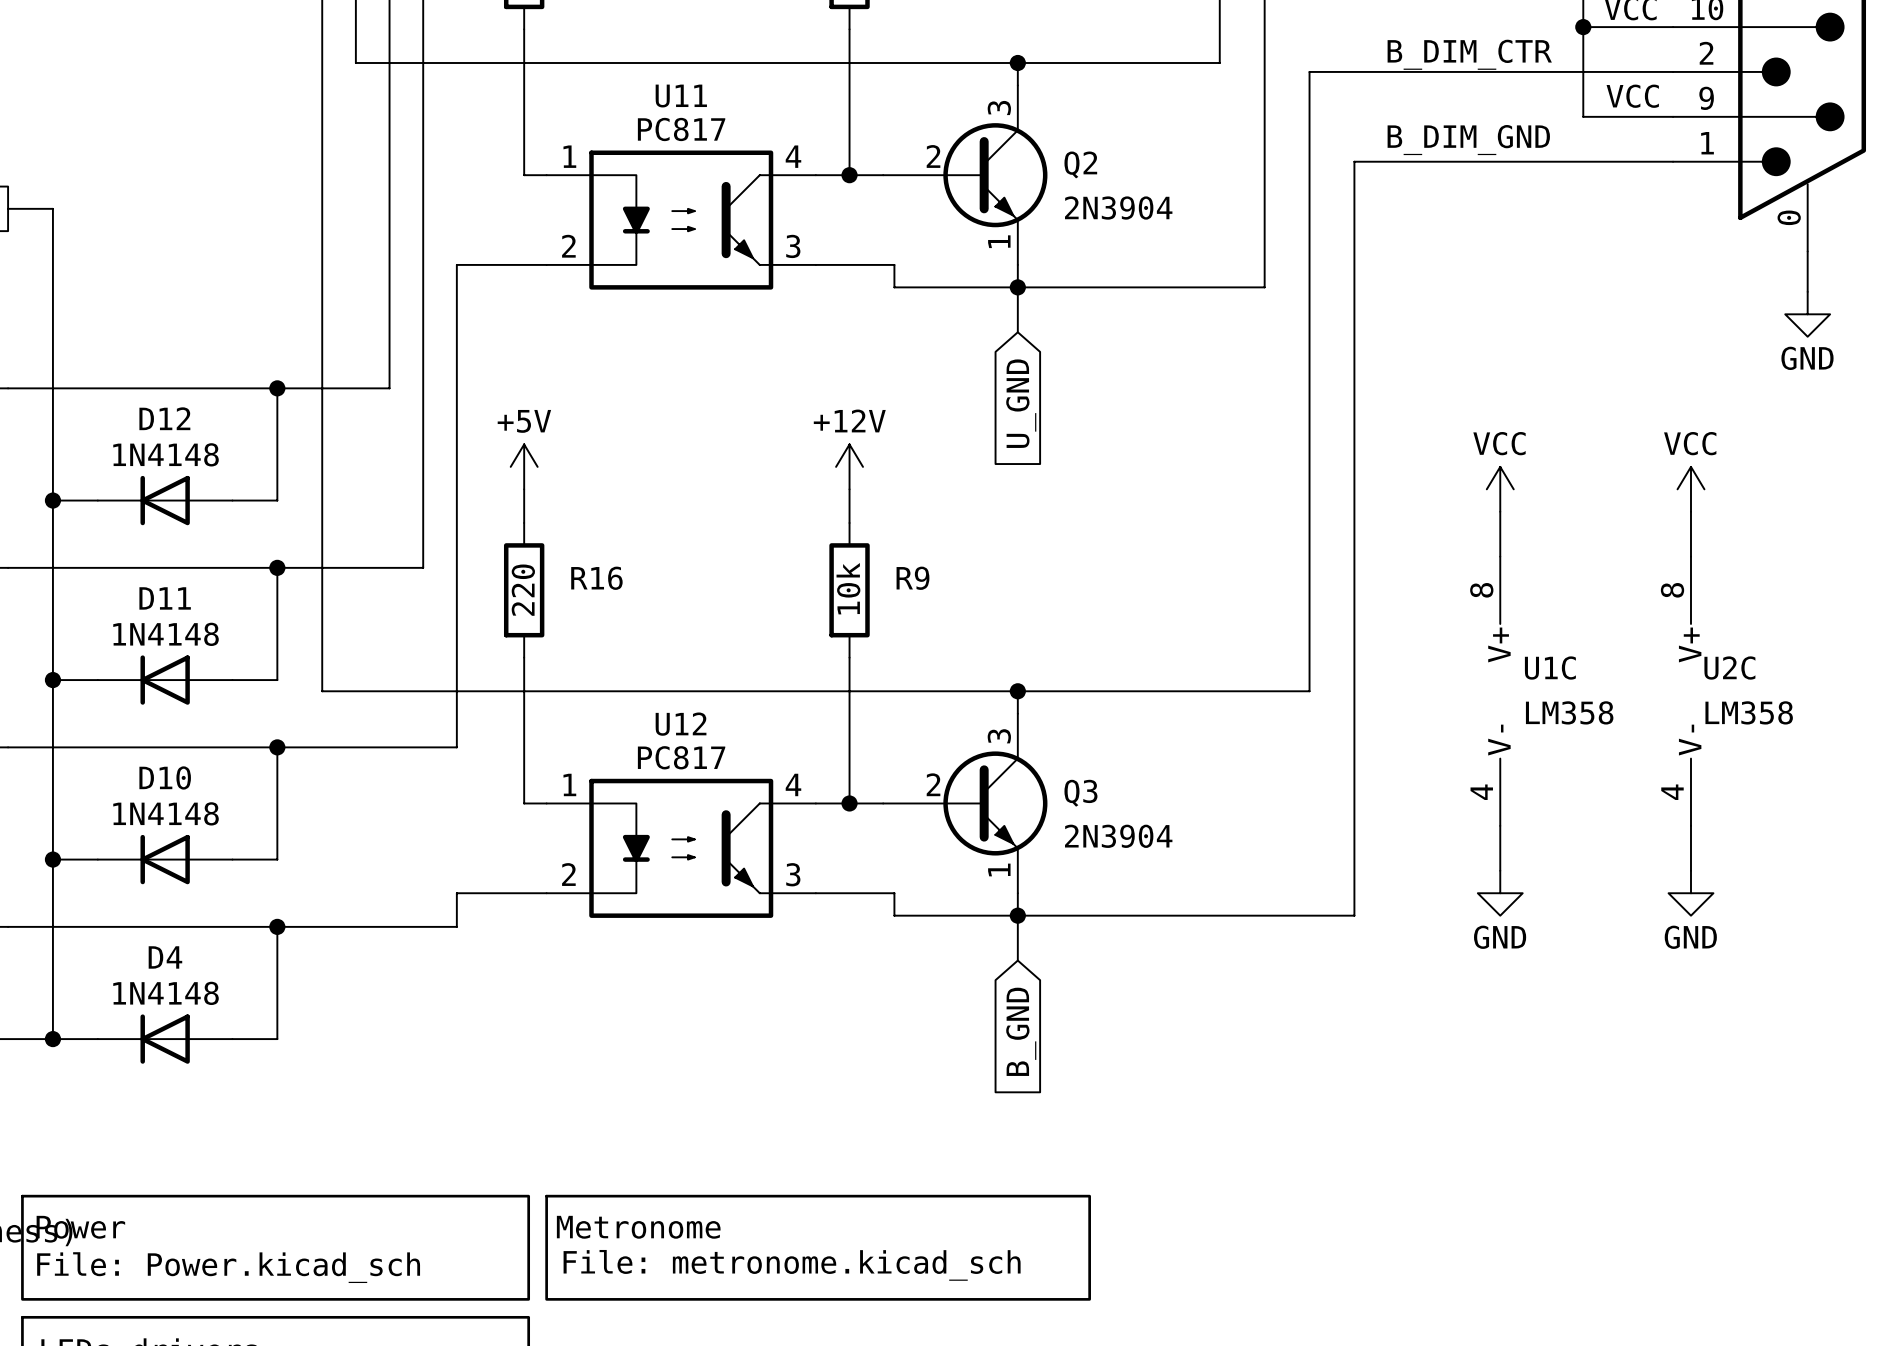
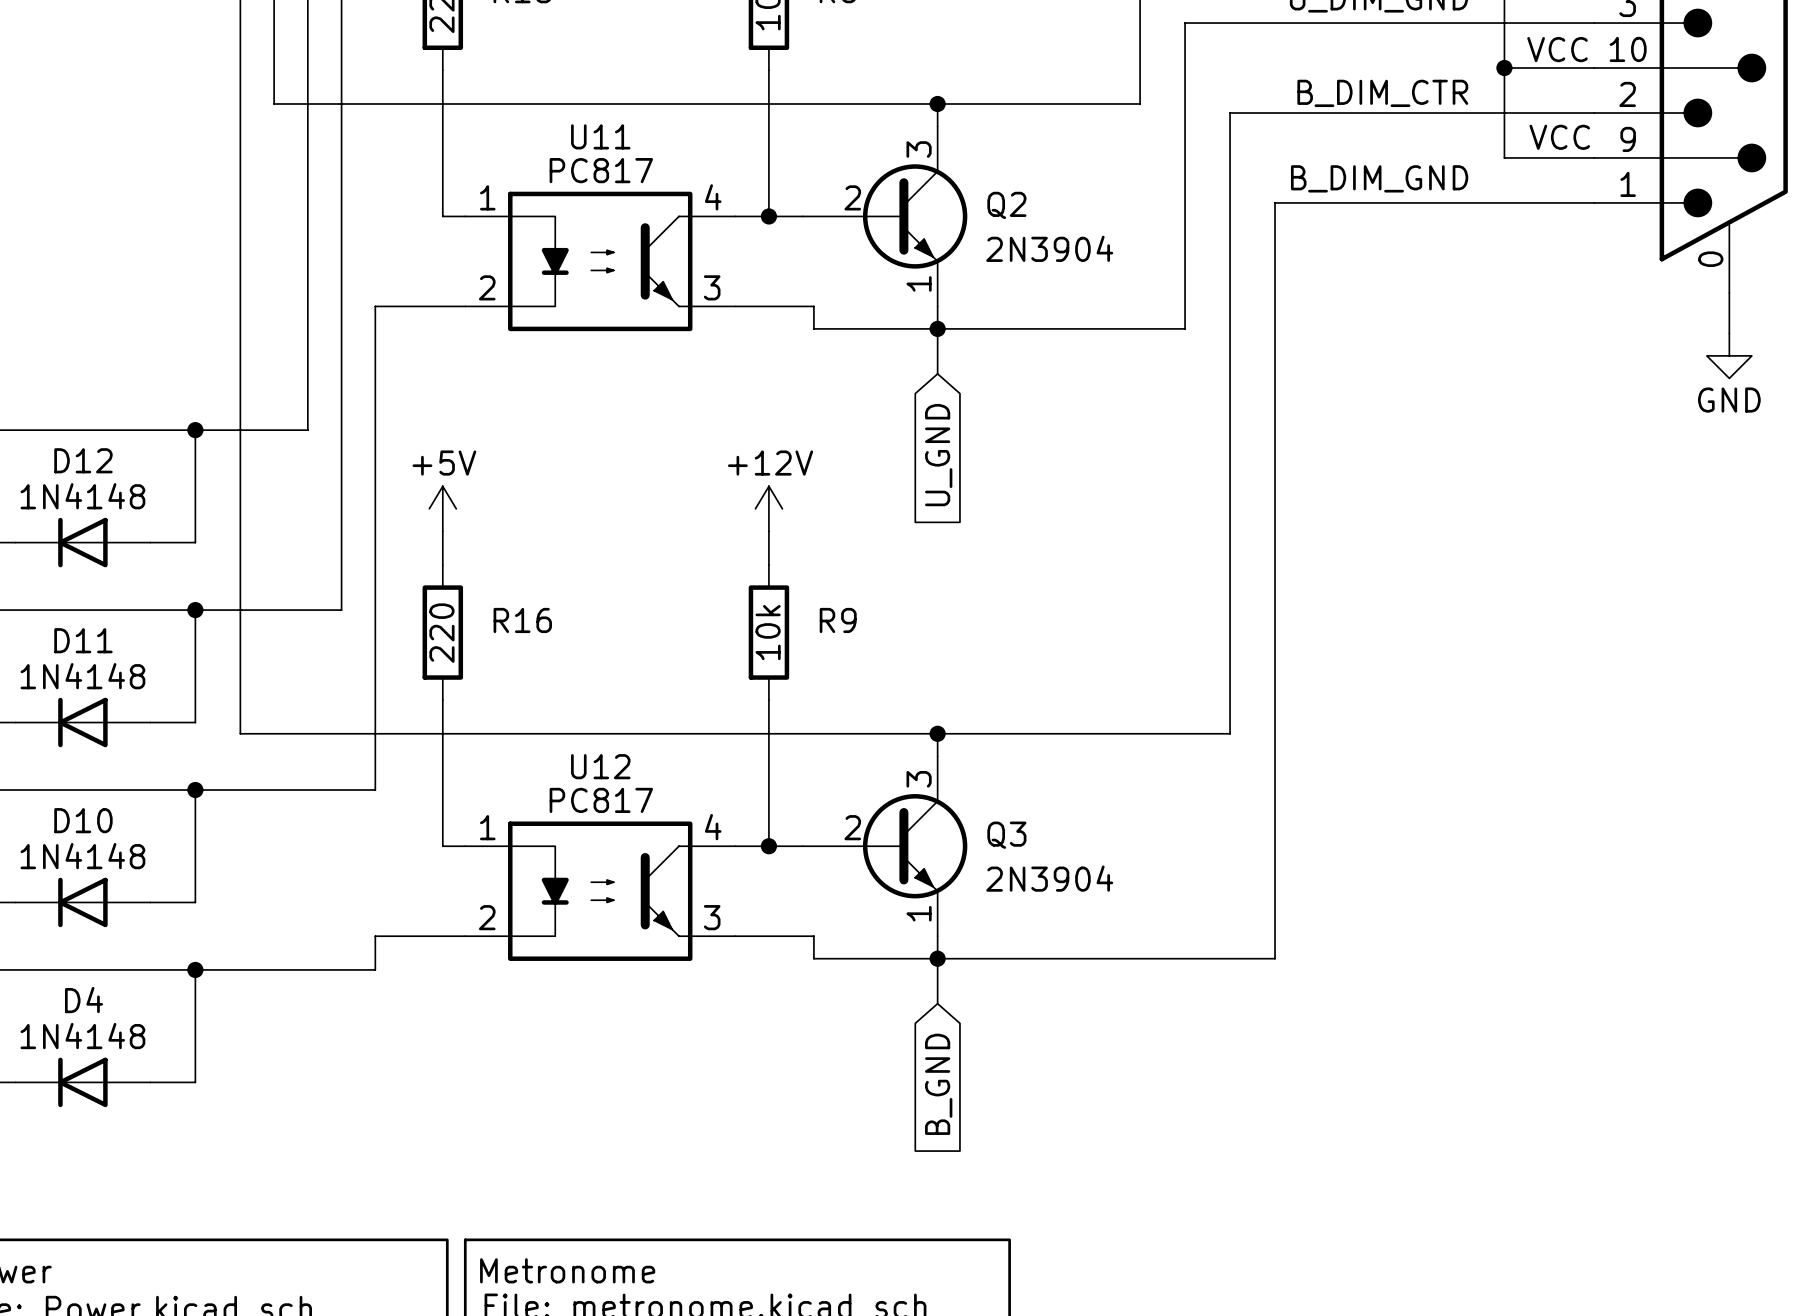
power symbol: VCC (1500, 489) -> none
power symbol: VCC (1690, 489) -> none
wire: (1500, 511) (1500, 556) -> none
wire: (1690, 511) (1690, 556) -> none
U1C: LM358 (1500, 691) -> none
U2C: LM358 (1690, 691) -> none
wire: (1500, 825) (1500, 870) -> none
wire: (1690, 825) (1690, 870) -> none
power symbol: GND (1500, 893) -> none
power symbol: GND (1690, 893) -> none

